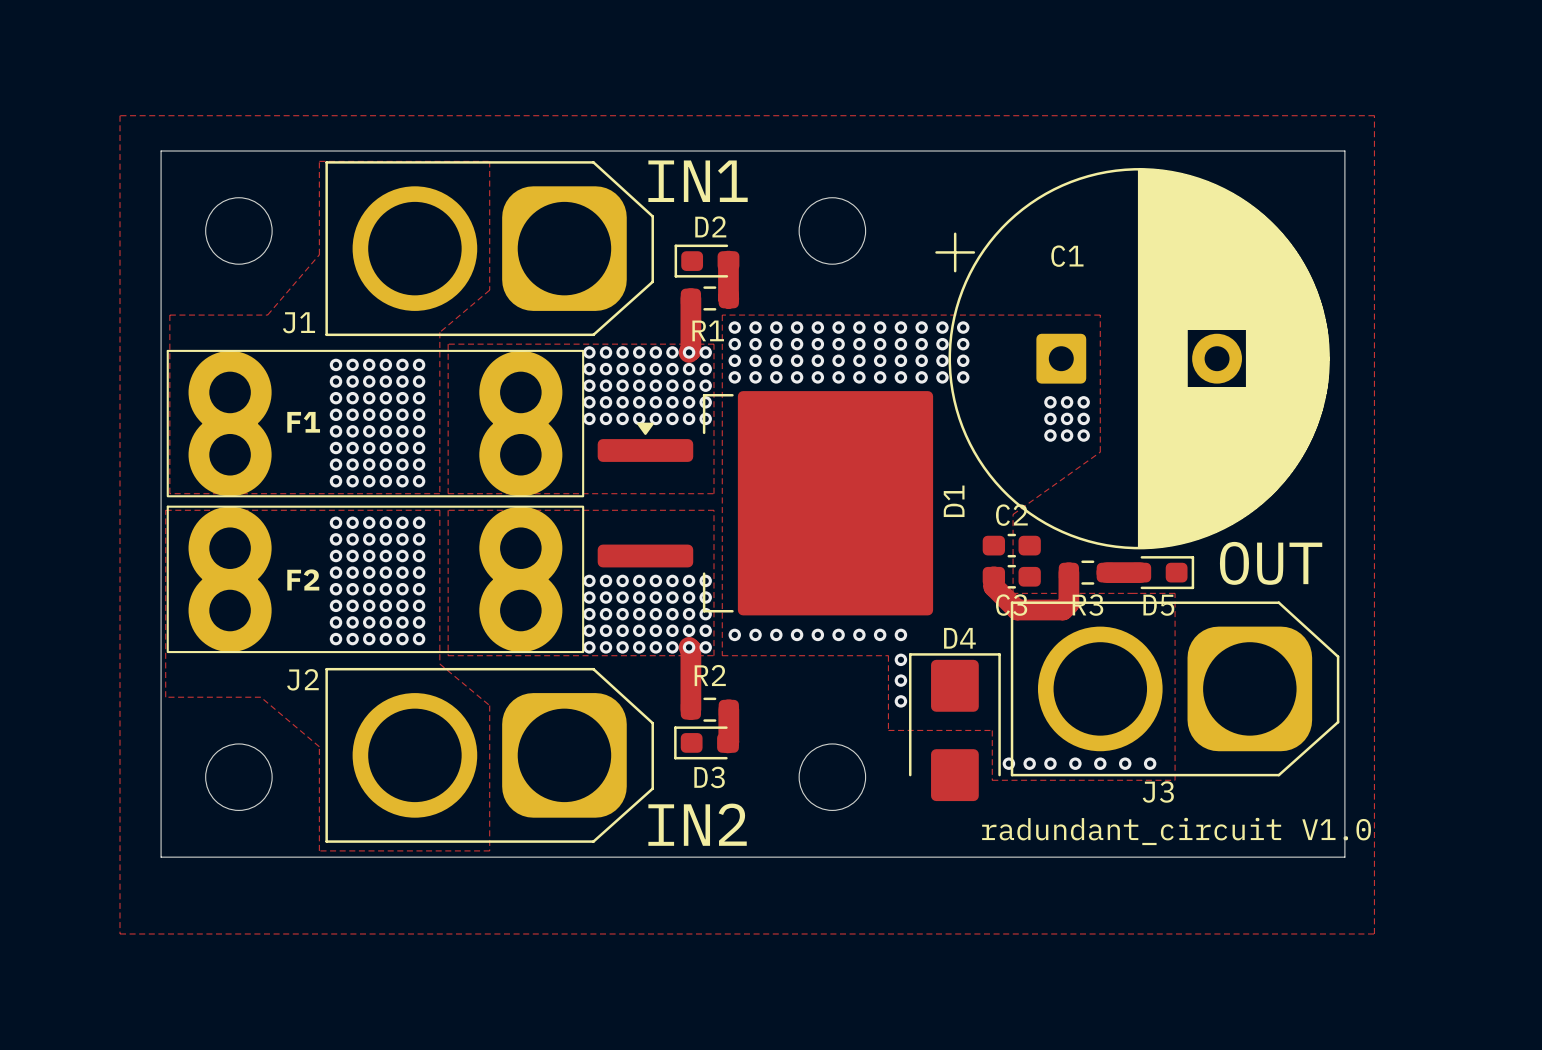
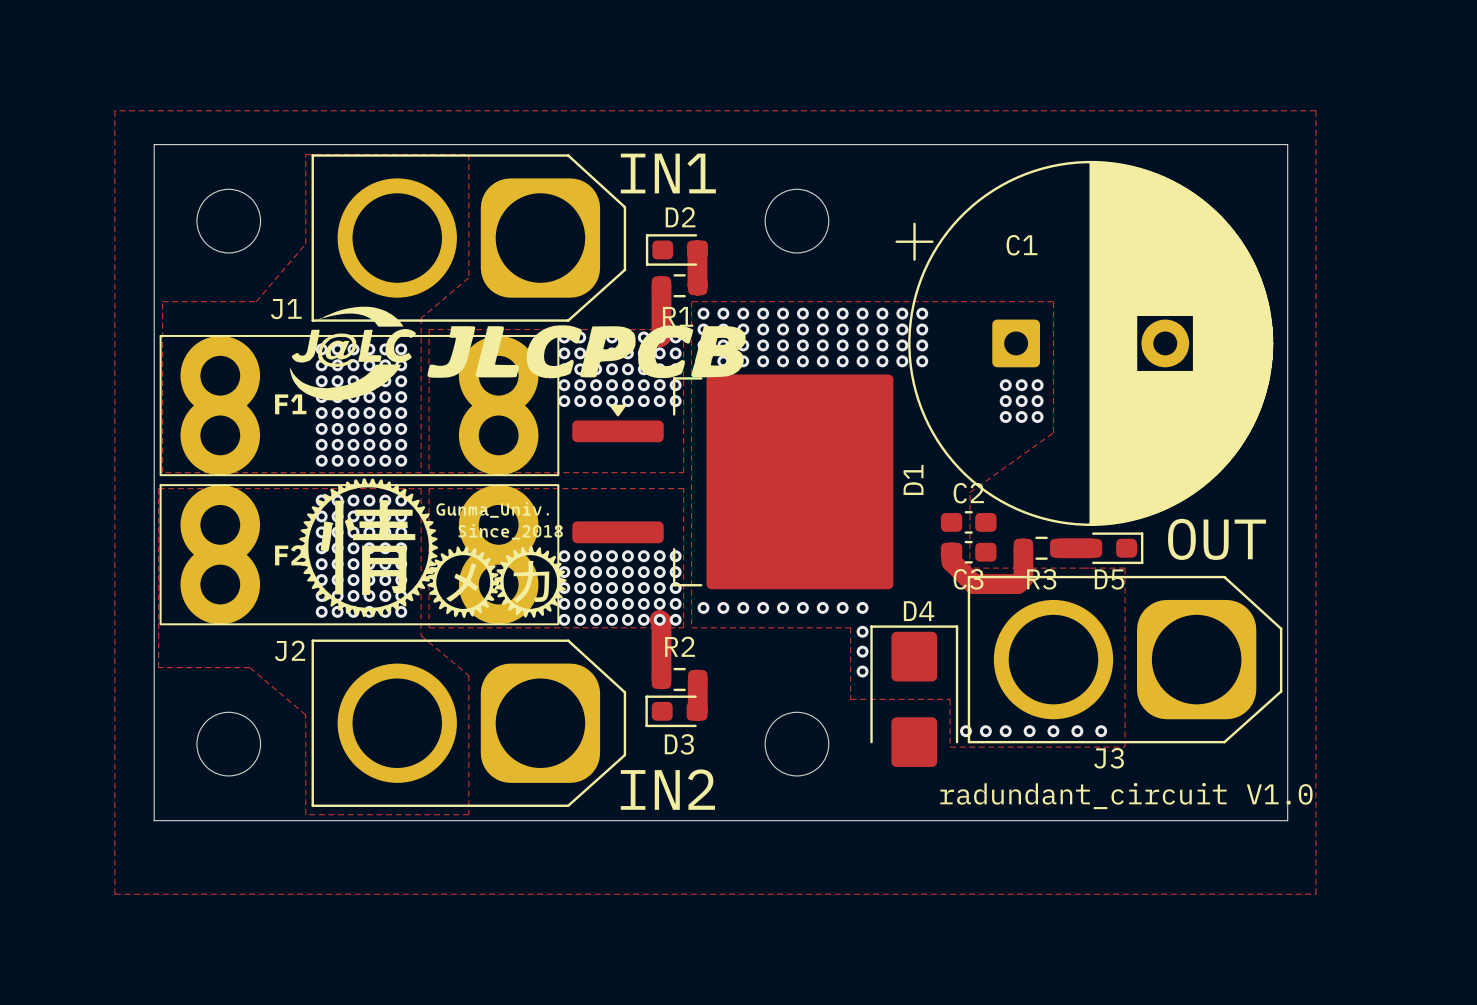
drawing: none -> [289, 306, 746, 401]
drawing: none -> [298, 478, 567, 619]

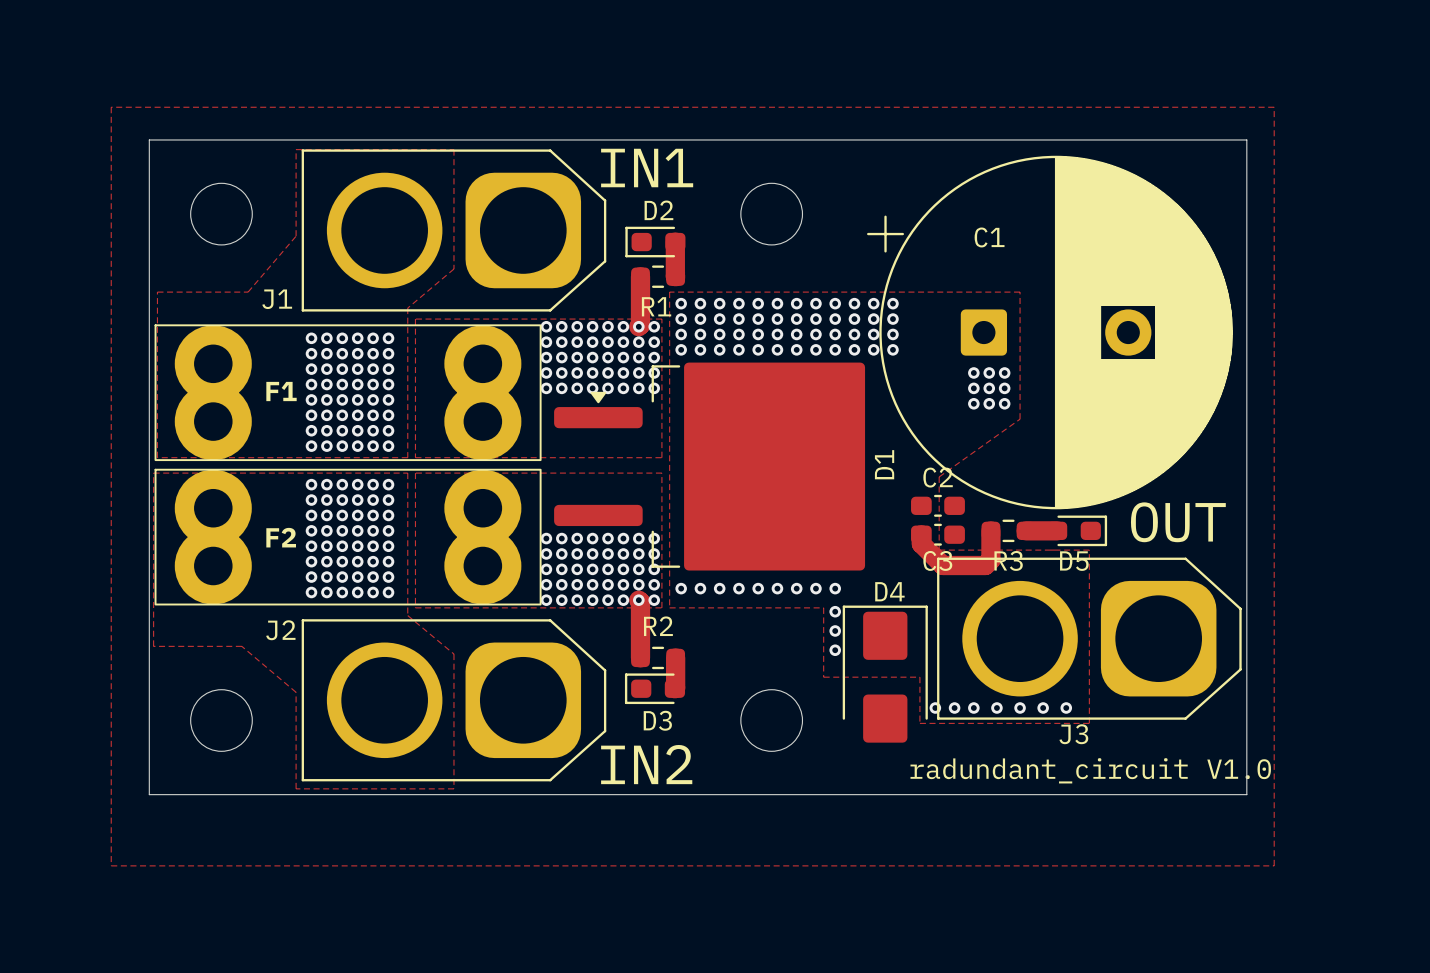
drawing: [289, 306, 746, 401] -> none
drawing: [298, 478, 567, 619] -> none

